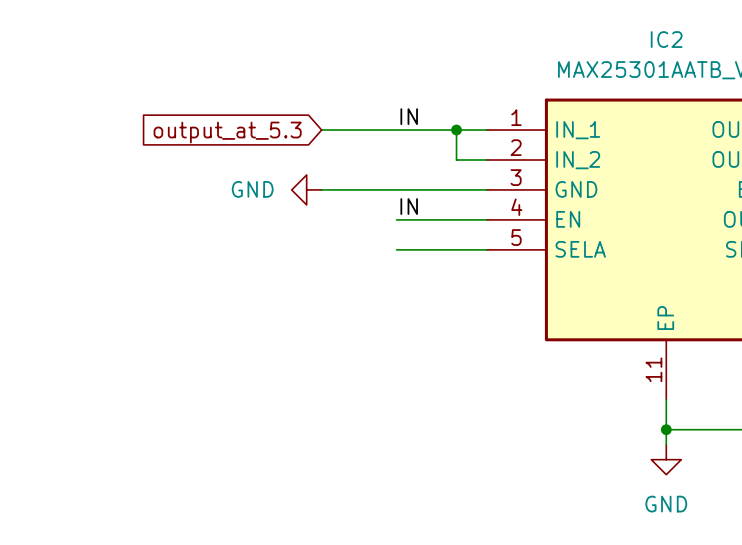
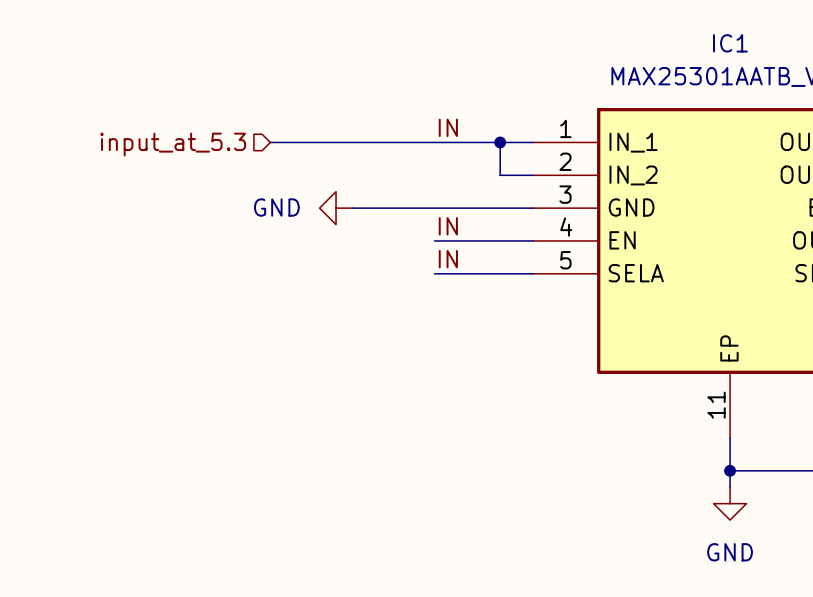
IC2 name: IC2 (666, 39) -> IC1 (730, 43)
wire: none -> (270, 142) (352, 142)
hierarchical label: none -> input_at_5.3 (173, 144)
global label: output_at_5.3 (227, 132) -> none
label: none -> IN (448, 259)

